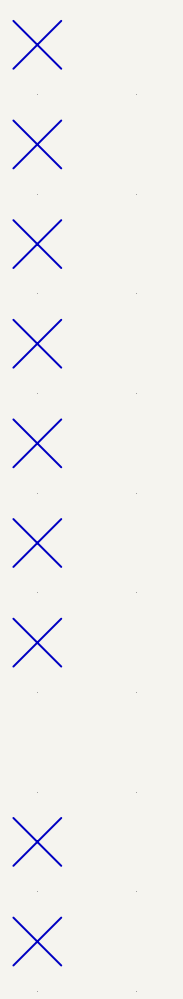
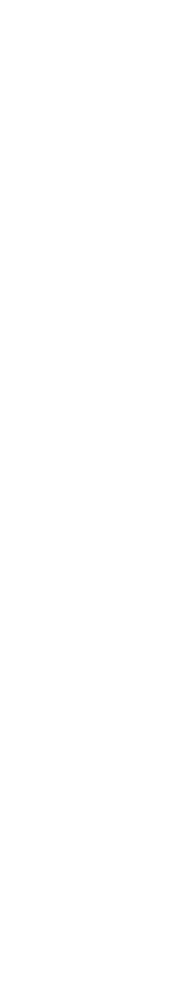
no-connect mark: (37, 44) -> none
no-connect mark: (37, 144) -> none
no-connect mark: (37, 244) -> none
no-connect mark: (37, 343) -> none
no-connect mark: (37, 443) -> none
no-connect mark: (37, 542) -> none
no-connect mark: (37, 642) -> none
no-connect mark: (37, 841) -> none
no-connect mark: (37, 941) -> none

